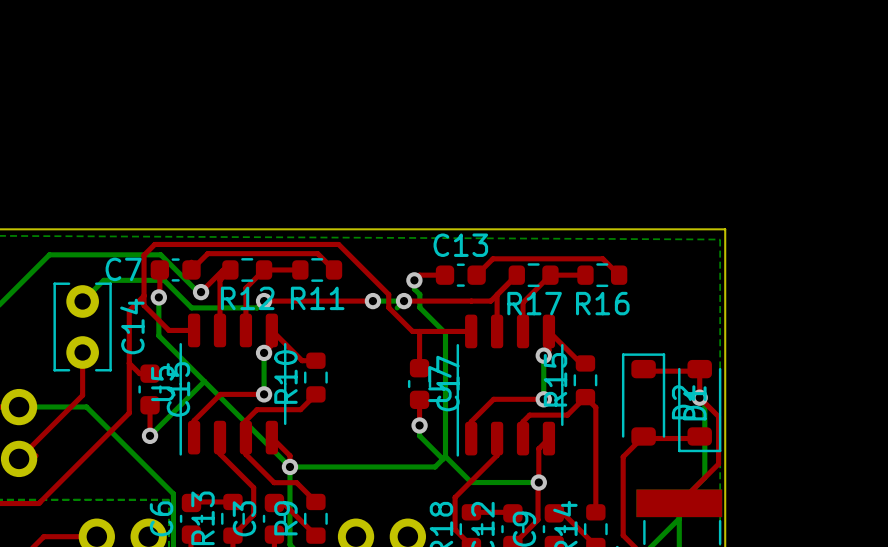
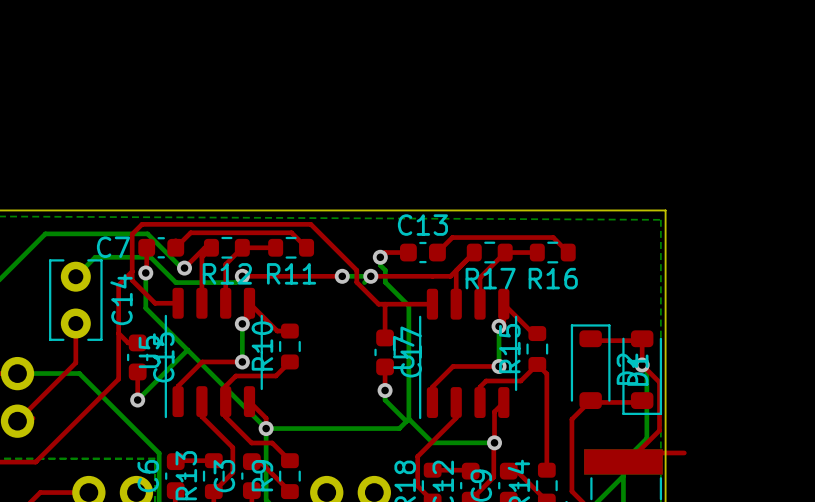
top track: (718, 464) (679, 503) (684, 503) -> (659, 425) (659, 430) (637, 452) (684, 452)

